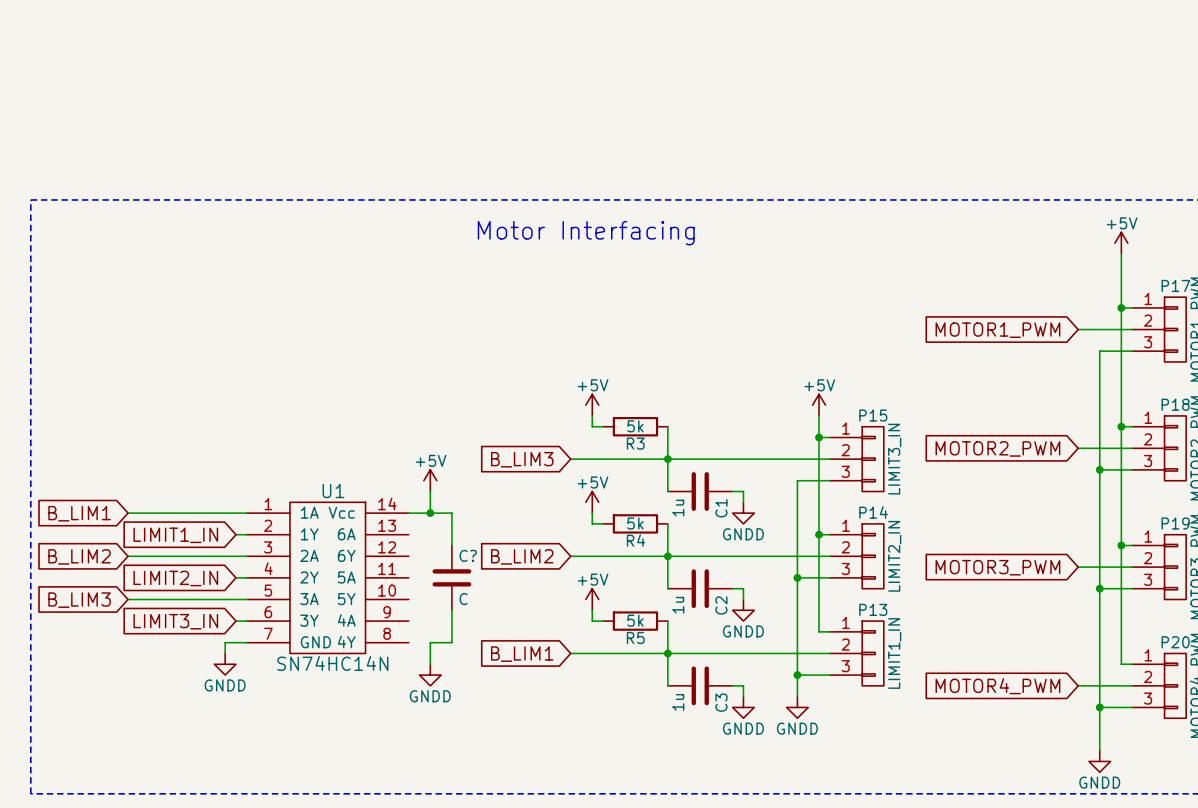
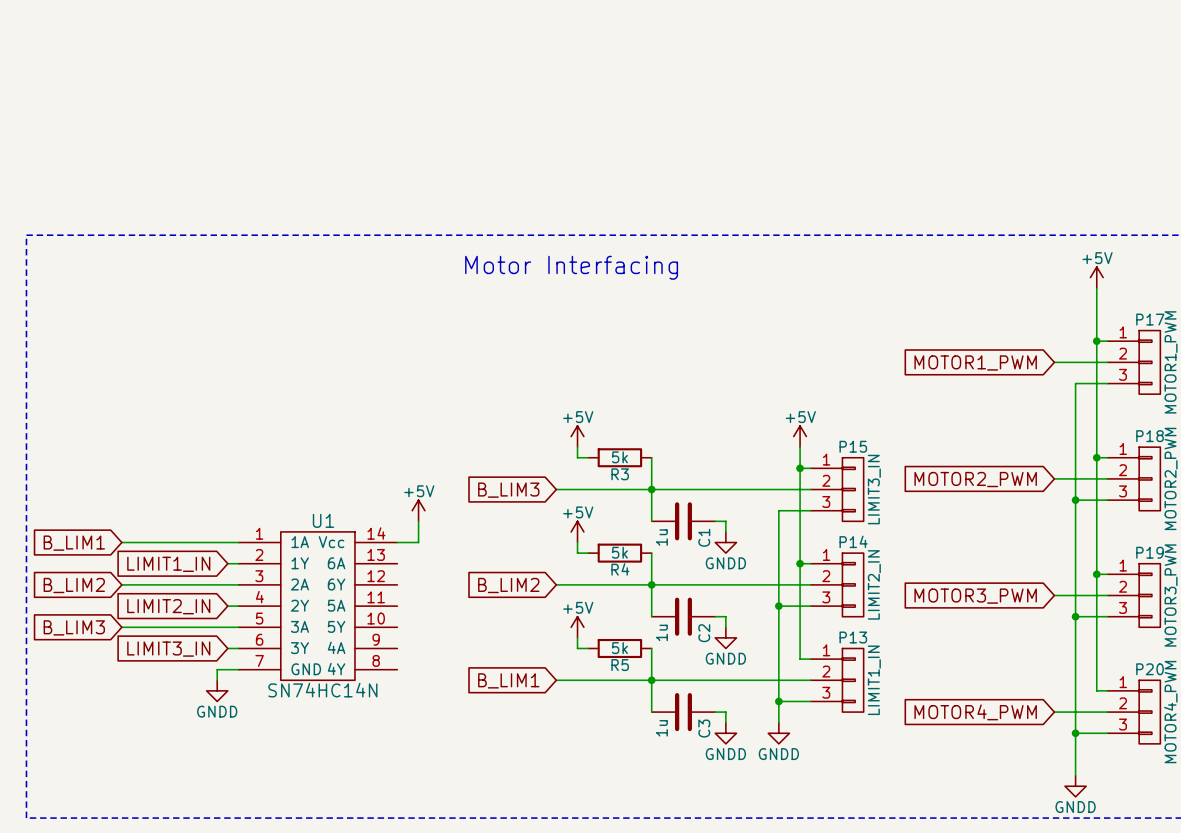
wire: (430, 513) (451, 513) (451, 545) -> none
junction: (430, 513) -> none
C?: C (451, 577) -> none
wire: (451, 610) (451, 642) (430, 642) (430, 664) -> none
power symbol: GNDD (430, 675) -> none

